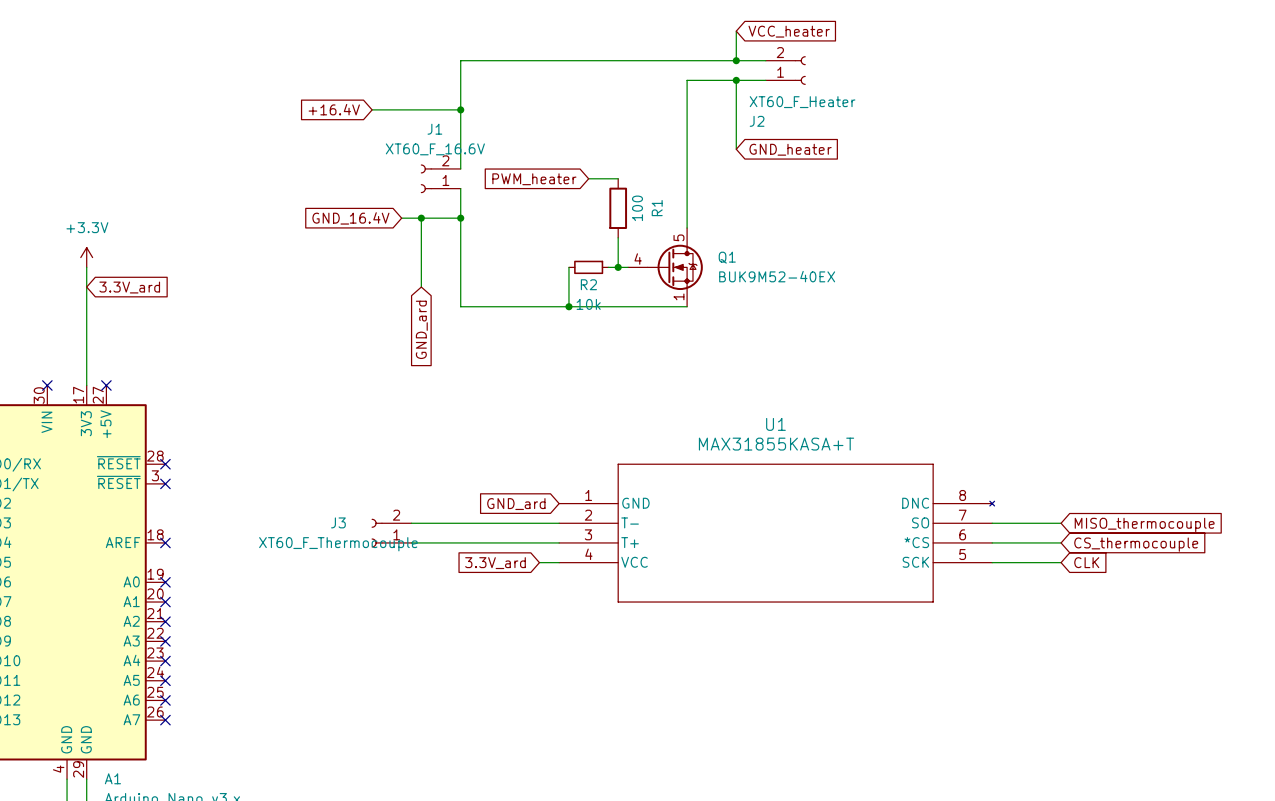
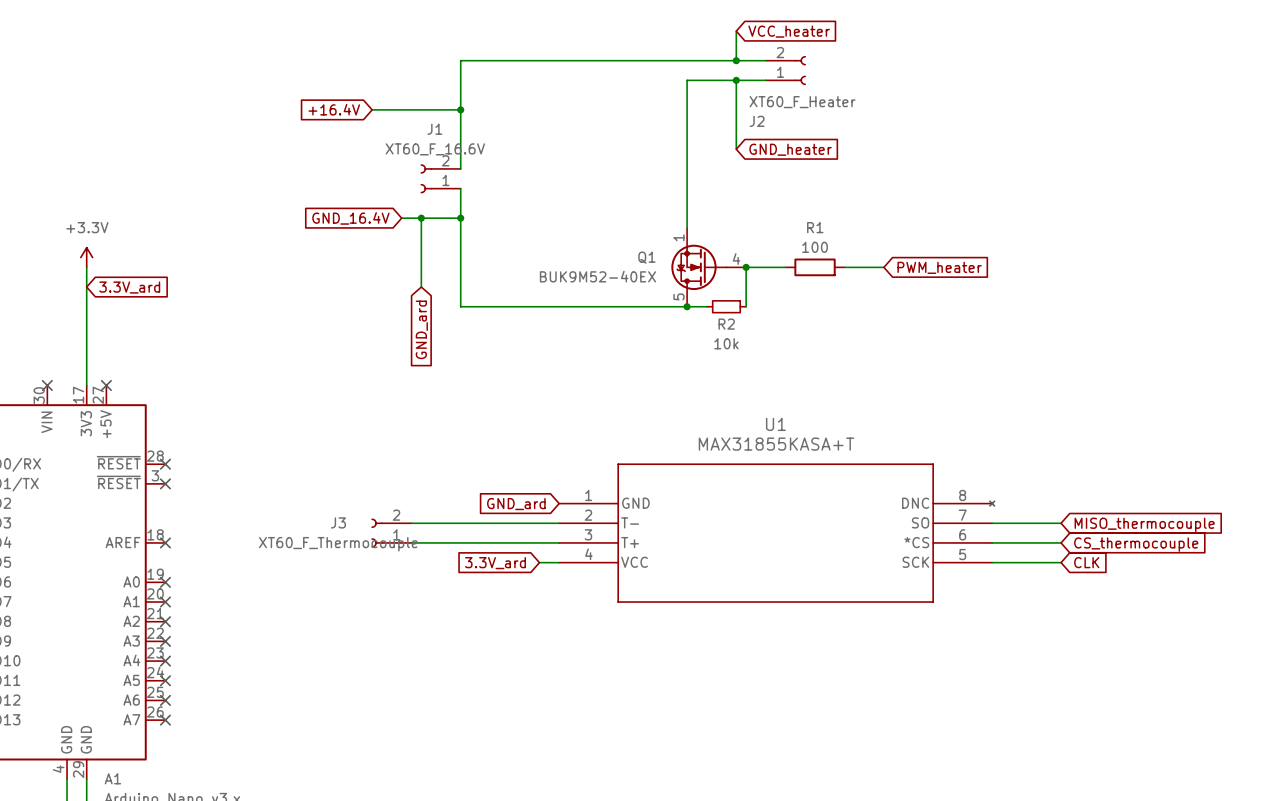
wire: (588, 178) (618, 178) -> none
global label: PWM_heater (534, 179) -> none
R1 rotation: 0° (618, 208) -> 90° clockwise (815, 267)
R1 position: (618, 208) -> (815, 267)
R1 value position: 100 (637, 208) -> 100 (815, 247)
R1 name position: R1 (657, 208) -> R1 (815, 227)
wire: (618, 237) (618, 267) -> none
Q1 name position: Q1 (727, 257) -> Q1 (646, 257)
wire: (568, 267) (568, 306) -> none
R2 position: (588, 267) -> (726, 306)
wire: (608, 267) (628, 267) -> (687, 306) (706, 306)
junction: (618, 267) -> none
Q1 rotation: 0° (675, 267) -> 180° (698, 267)
junction: none -> (746, 267)
wire: none -> (785, 267) (746, 267) (746, 306)
wire: none -> (844, 267) (883, 267)
global label: none -> PWM_heater (939, 267)
Q1 value position: BUK9M52-40EX (777, 276) -> BUK9M52-40EX (597, 276)
junction: (568, 306) -> none
junction: none -> (687, 306)

